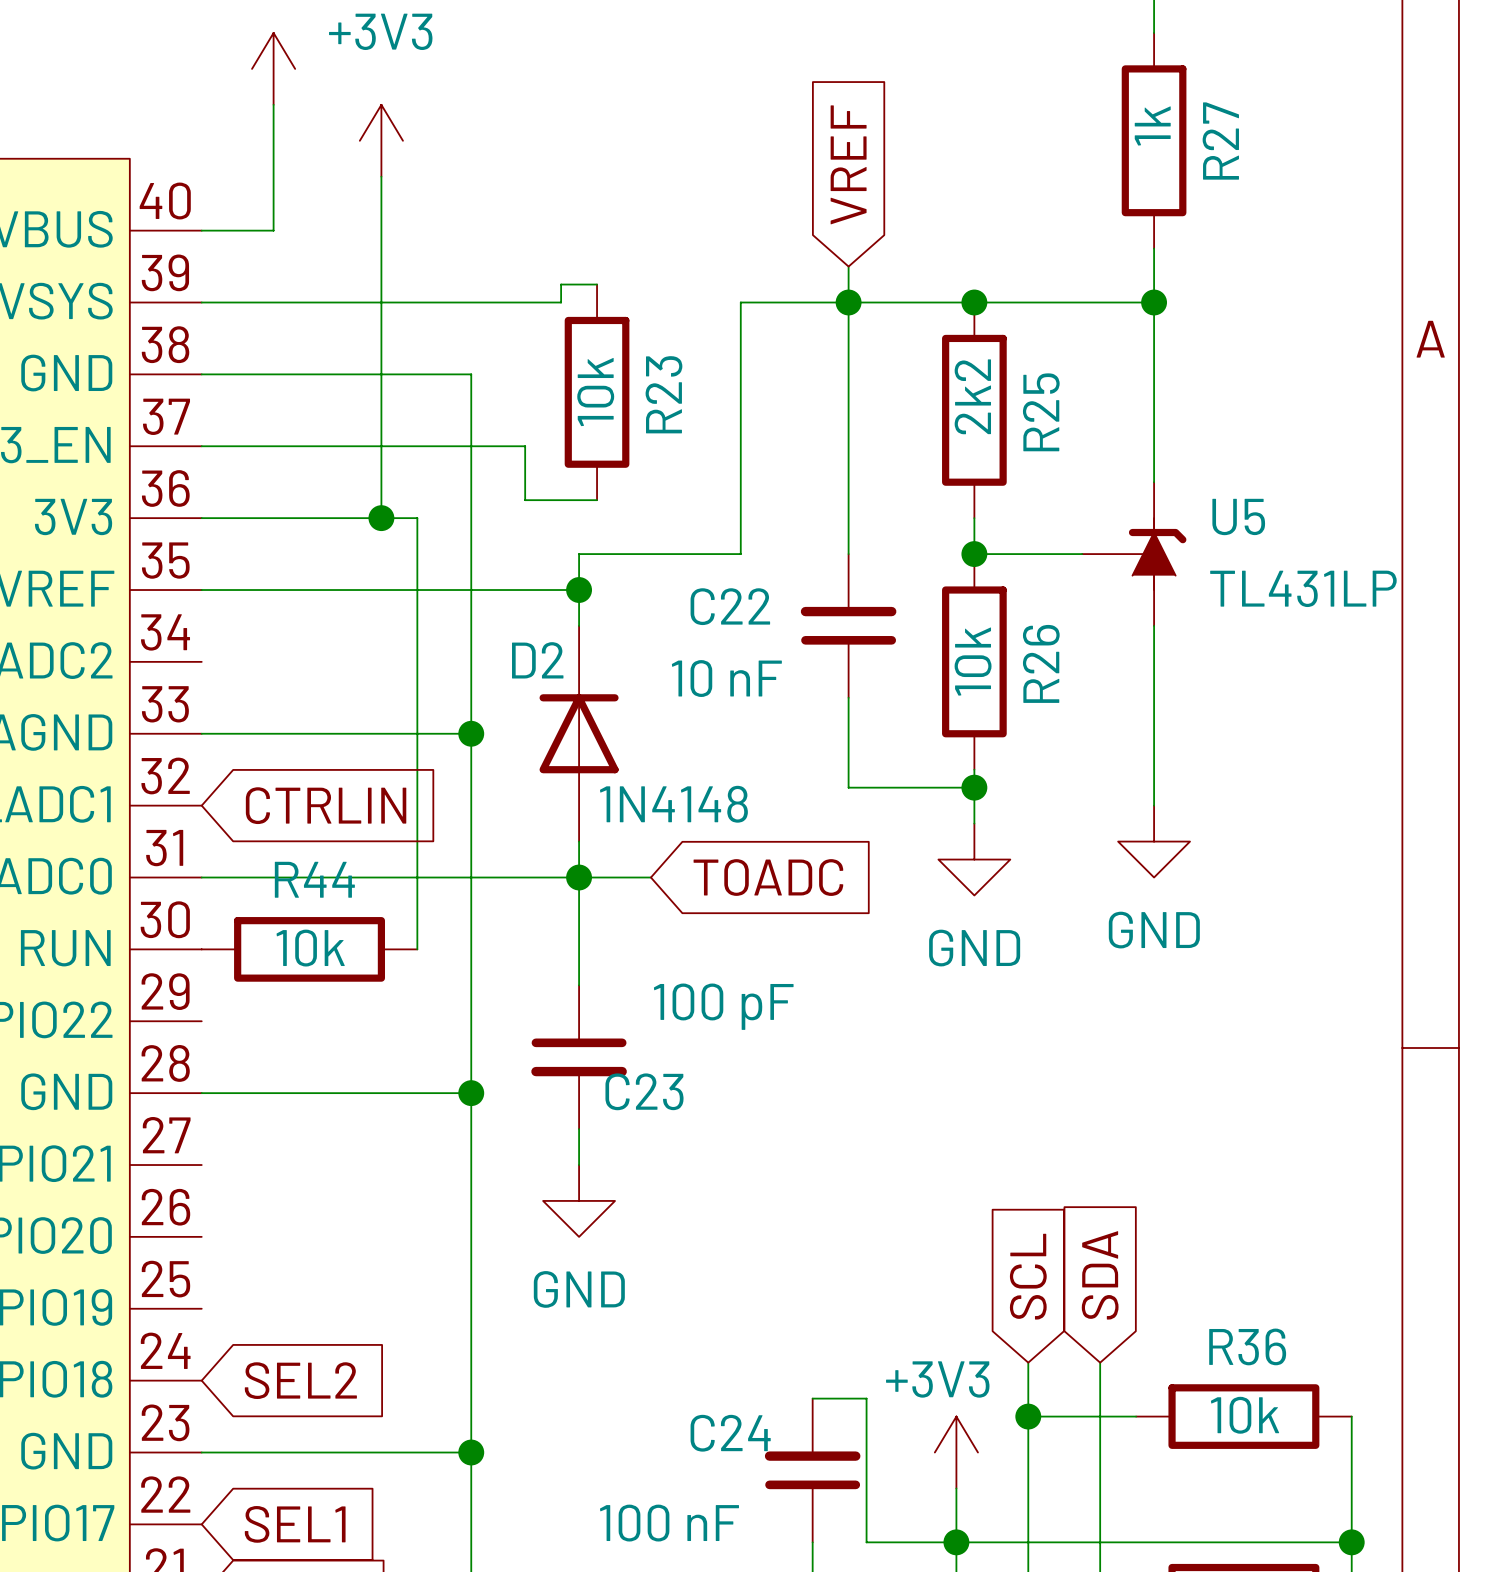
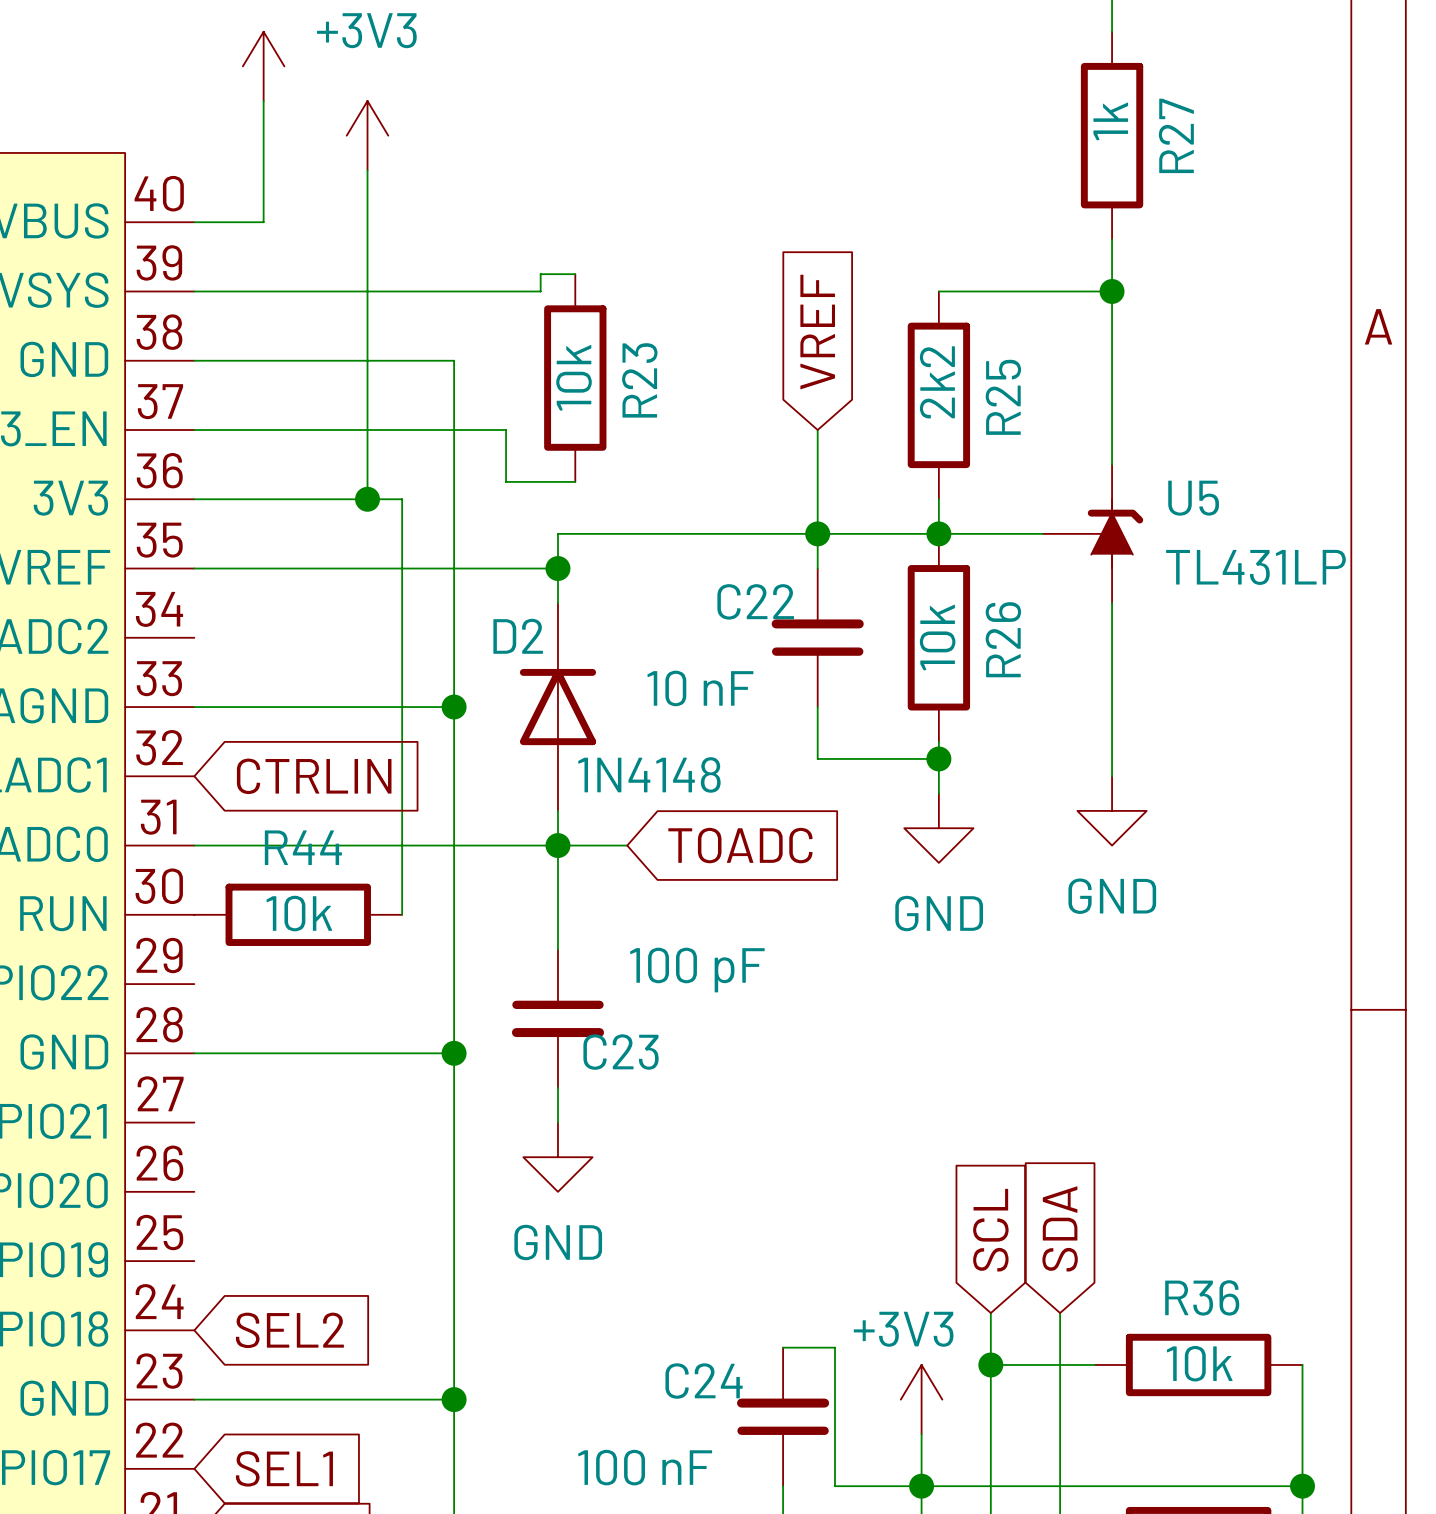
global label position: VREF (848, 164) -> VREF (817, 332)
wire: (848, 266) (848, 446) -> none
junction: (848, 302) -> none
wire: (974, 302) (740, 302) (740, 554) -> (938, 533) (713, 533)
junction: (974, 302) -> none
junction: none -> (817, 533)
C22 name position: C22 (730, 606) -> C22 (755, 601)
C22 position: (848, 625) -> (817, 637)

